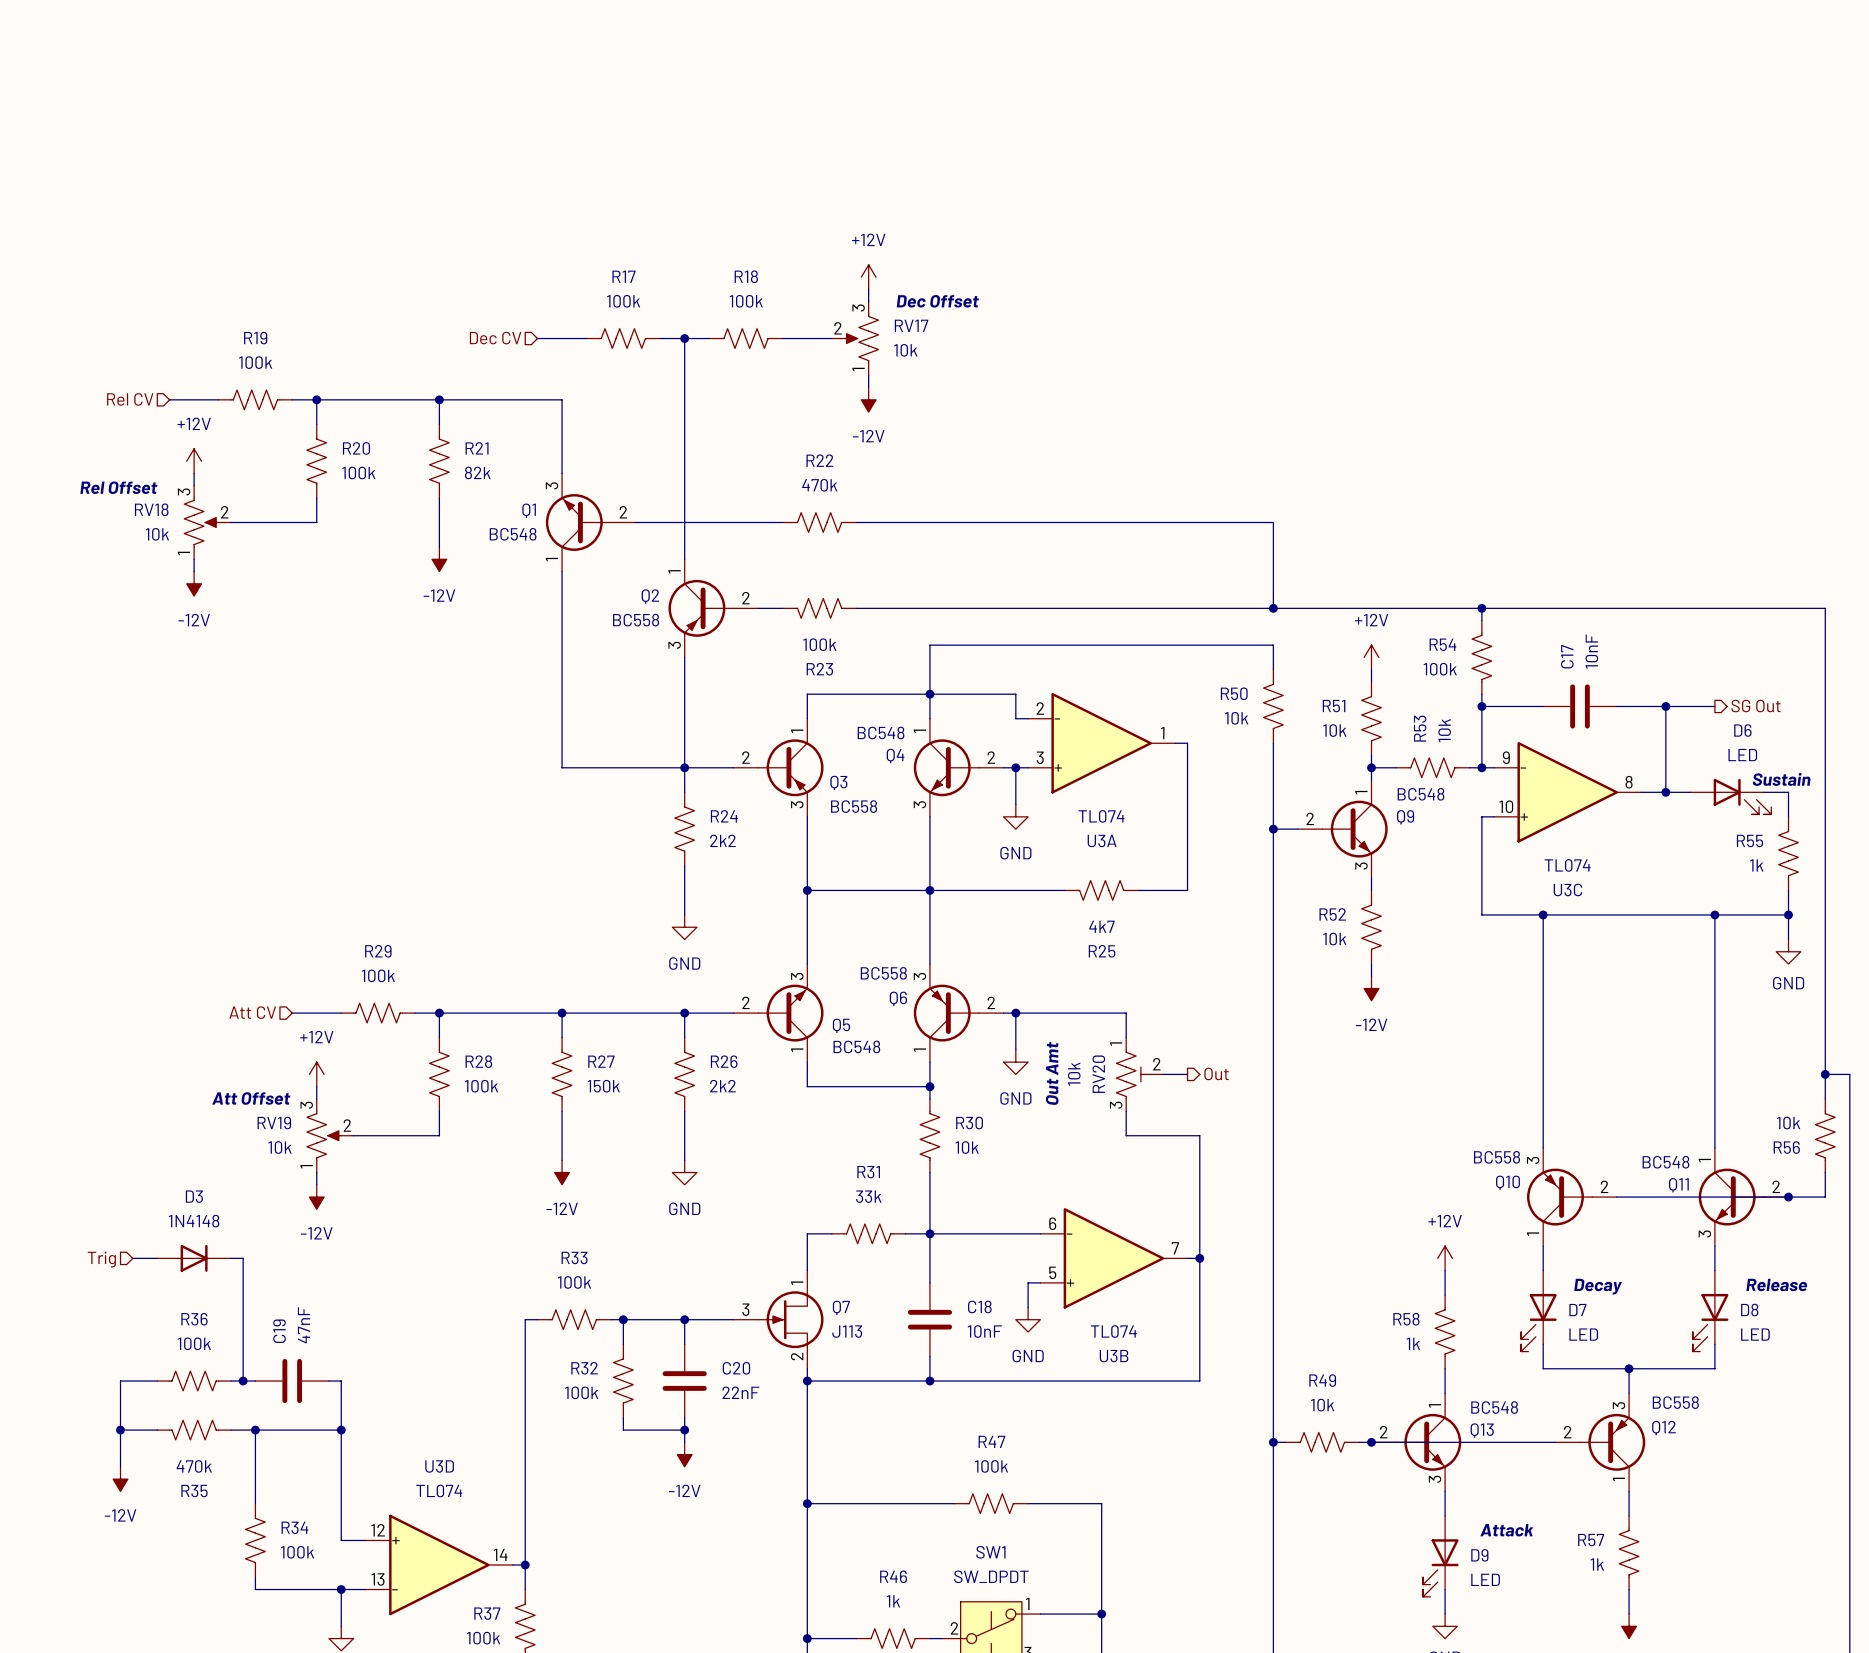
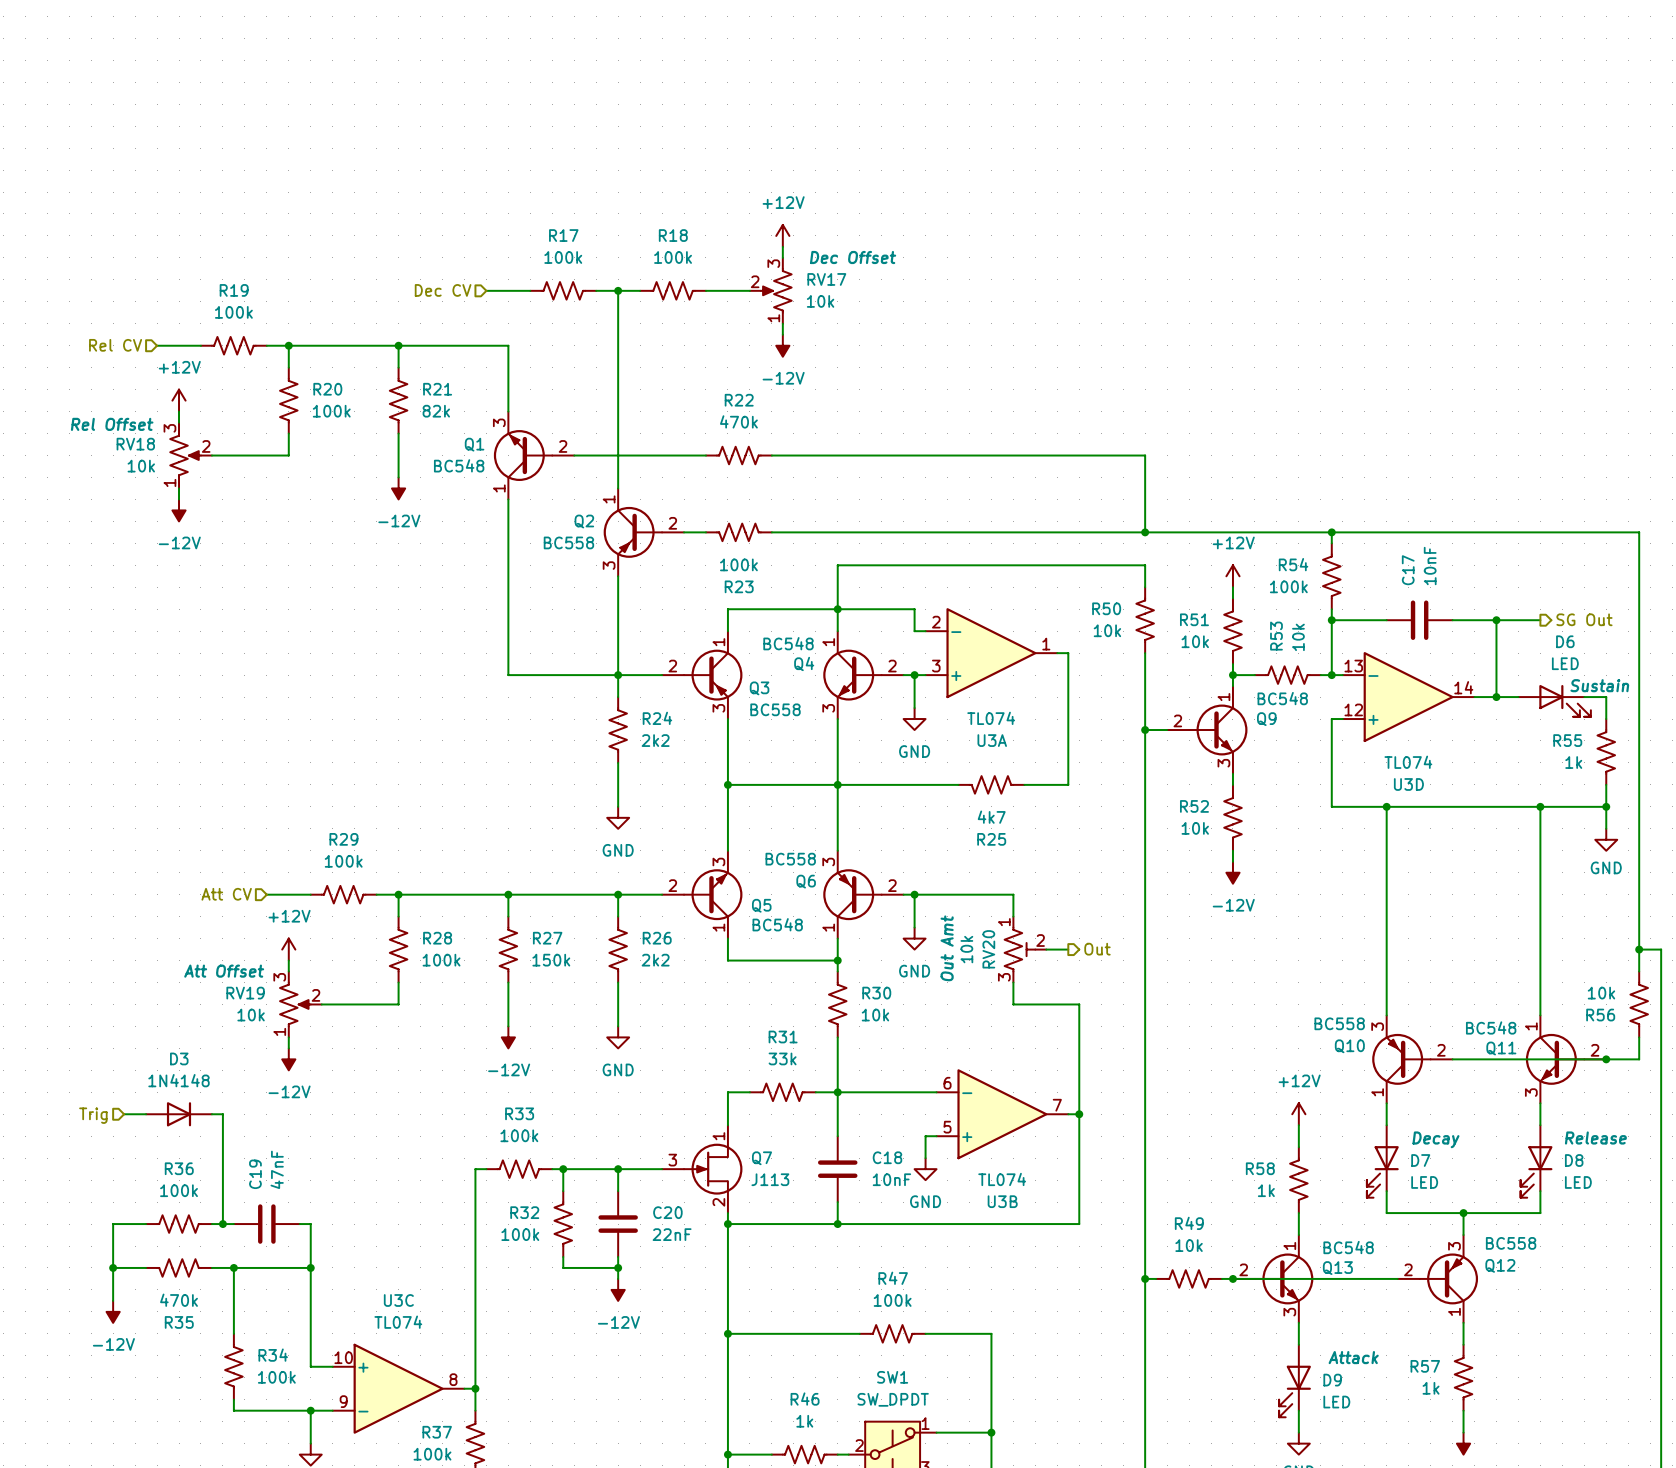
U3C flip: as is (1567, 792) -> up-down (398, 1388)
U3C position: (1567, 792) -> (398, 1388)
U3D flip: as is (439, 1564) -> up-down (1408, 697)
U3D position: (439, 1564) -> (1408, 697)

